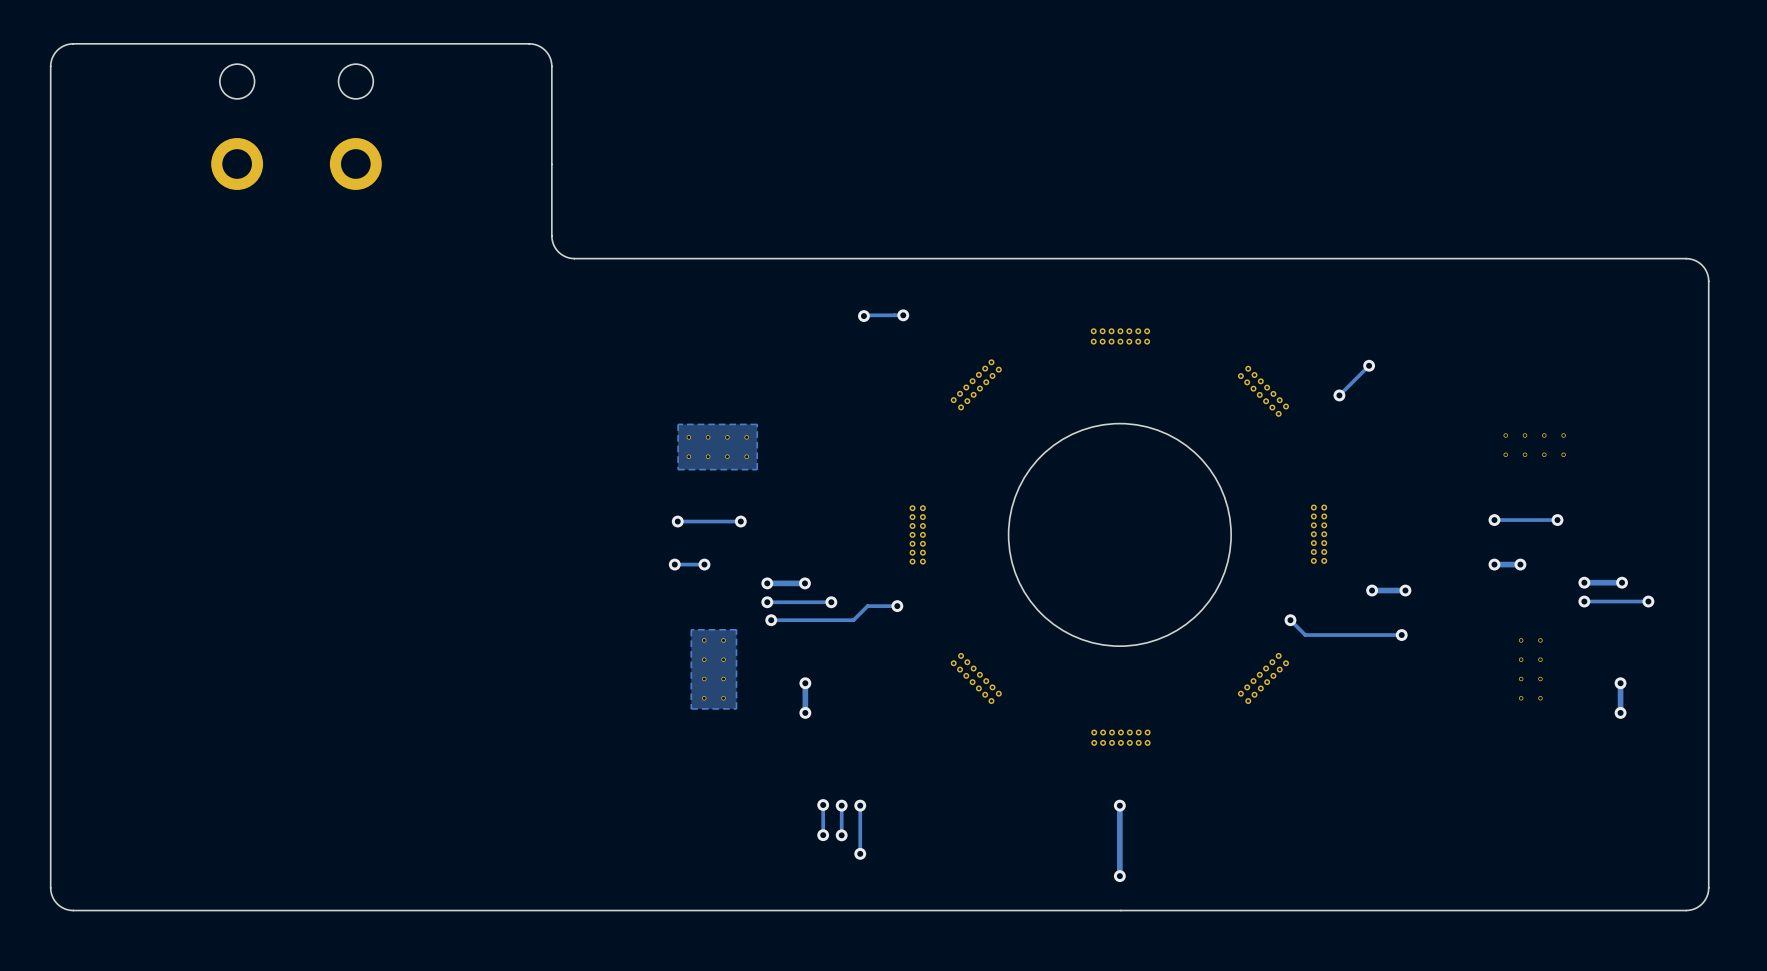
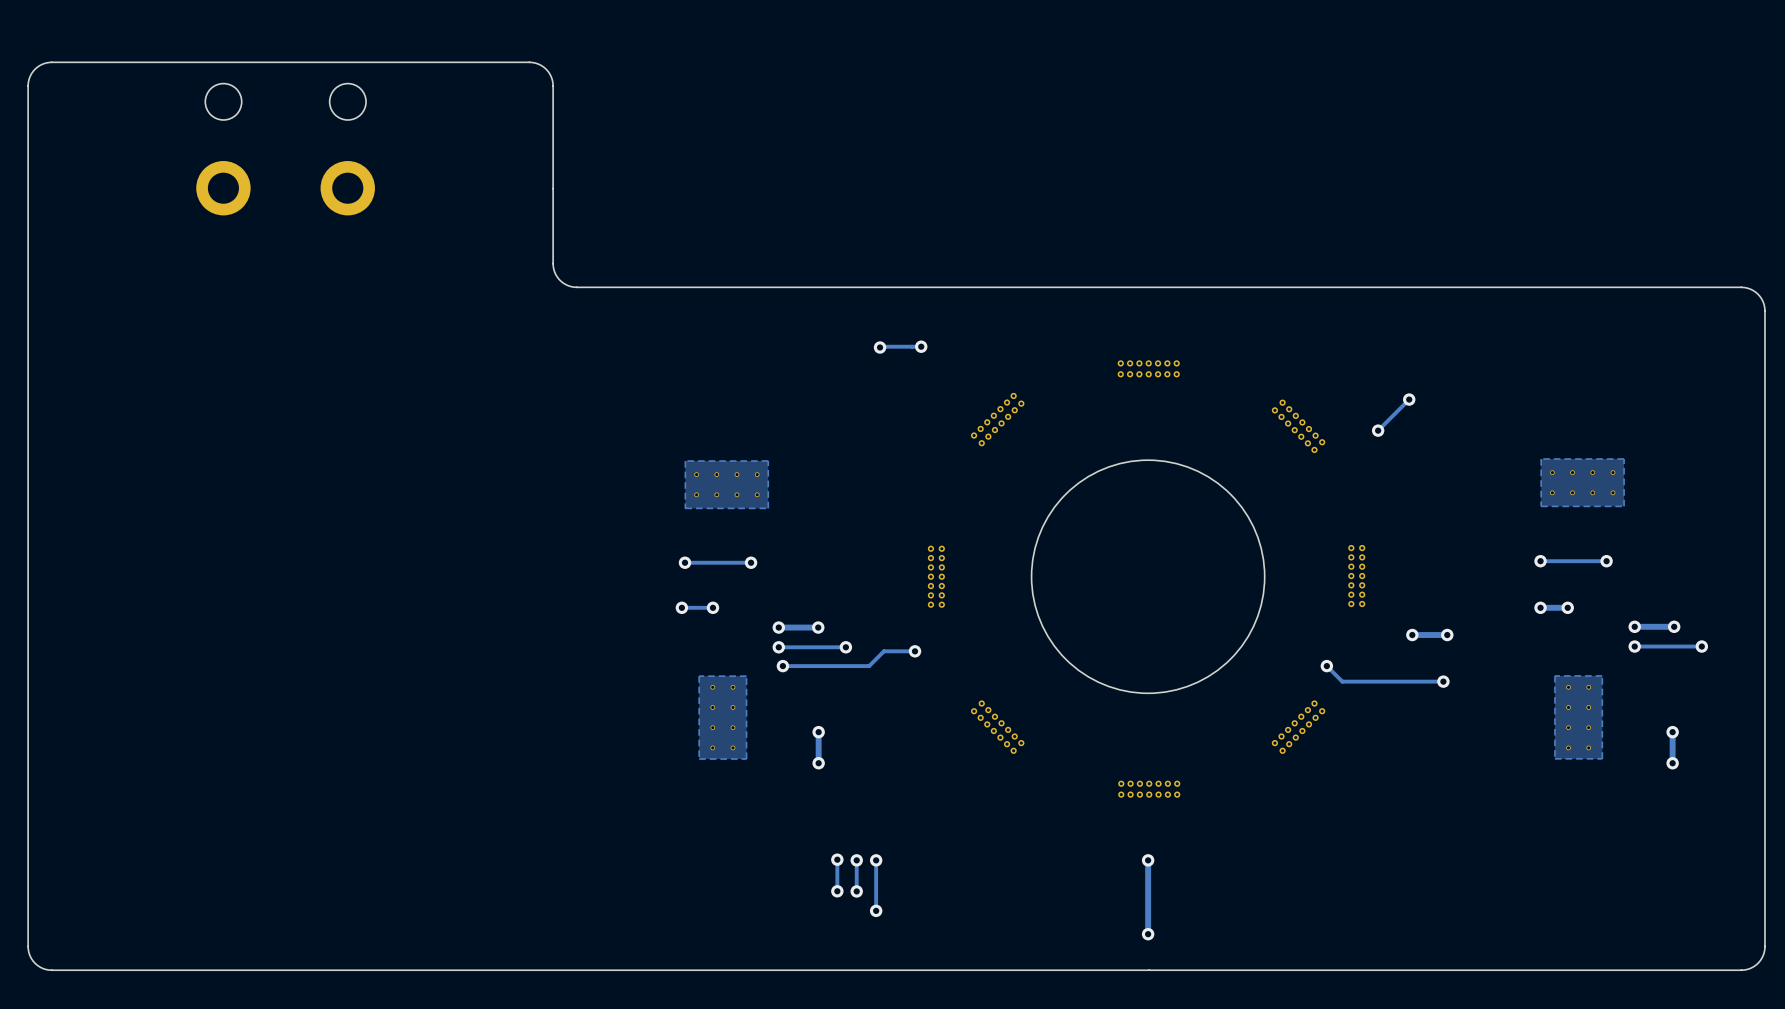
zone outline: none -> (1624, 459) (1624, 506) (1541, 506) (1541, 459) (1624, 459)
zone outline: none -> (1602, 675) (1602, 758) (1554, 758) (1554, 675) (1602, 675)

